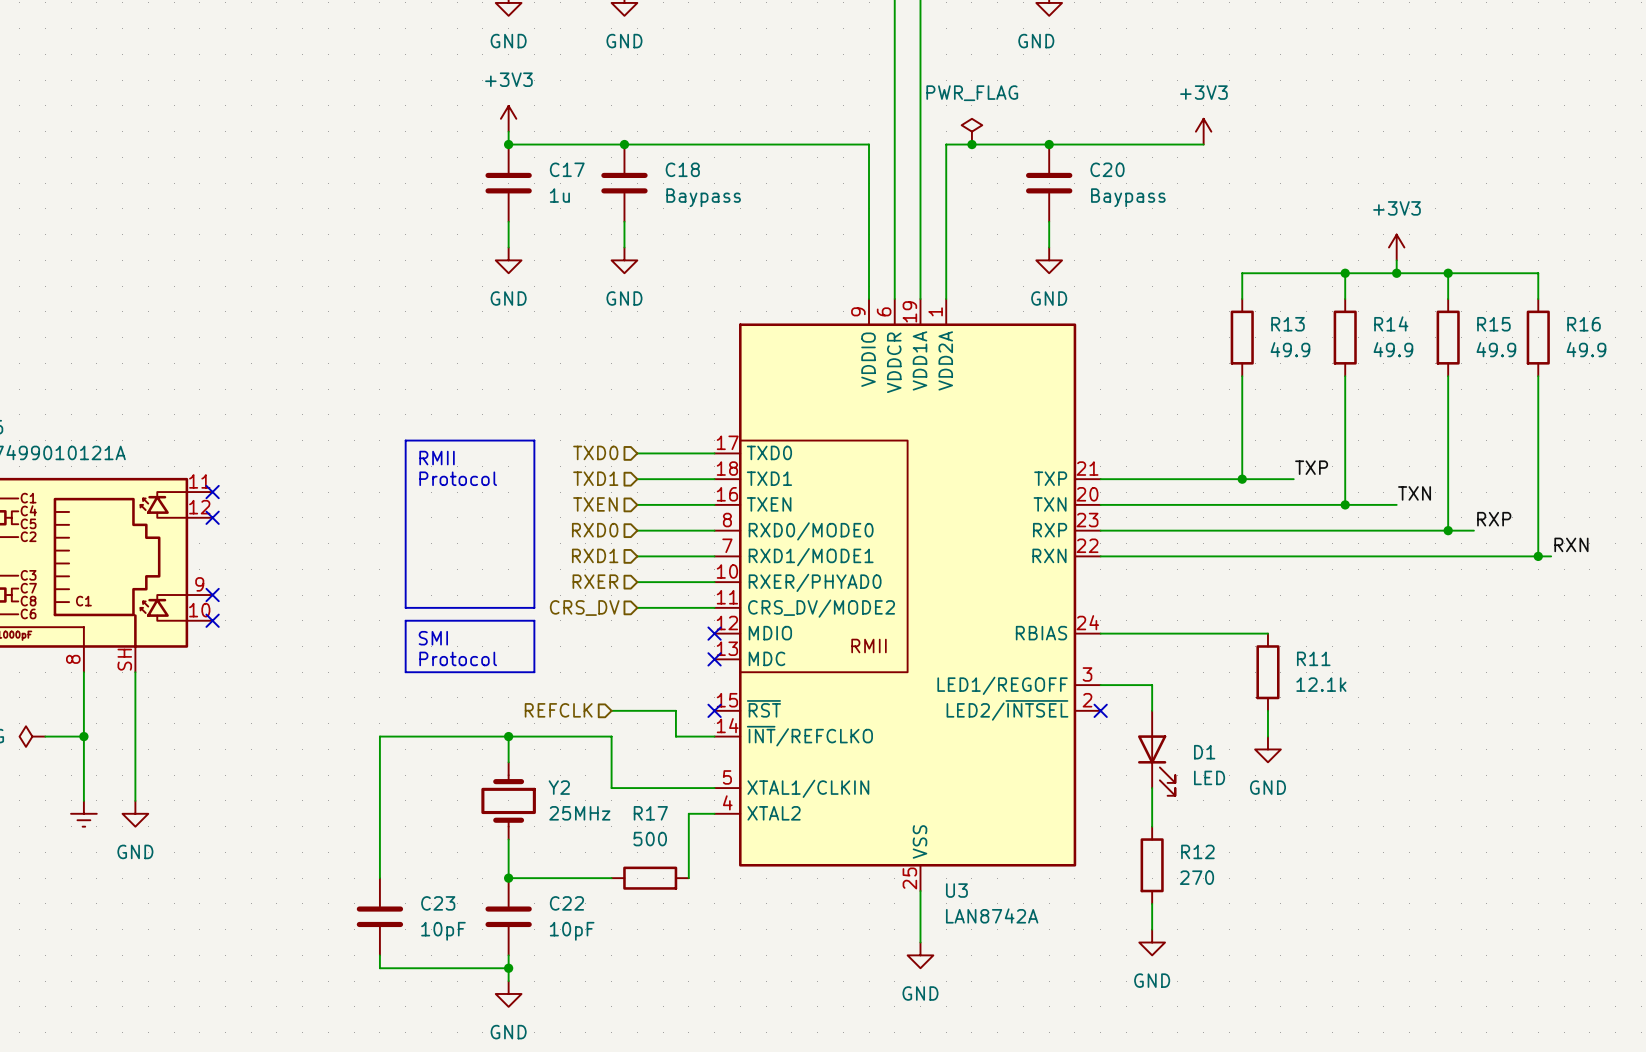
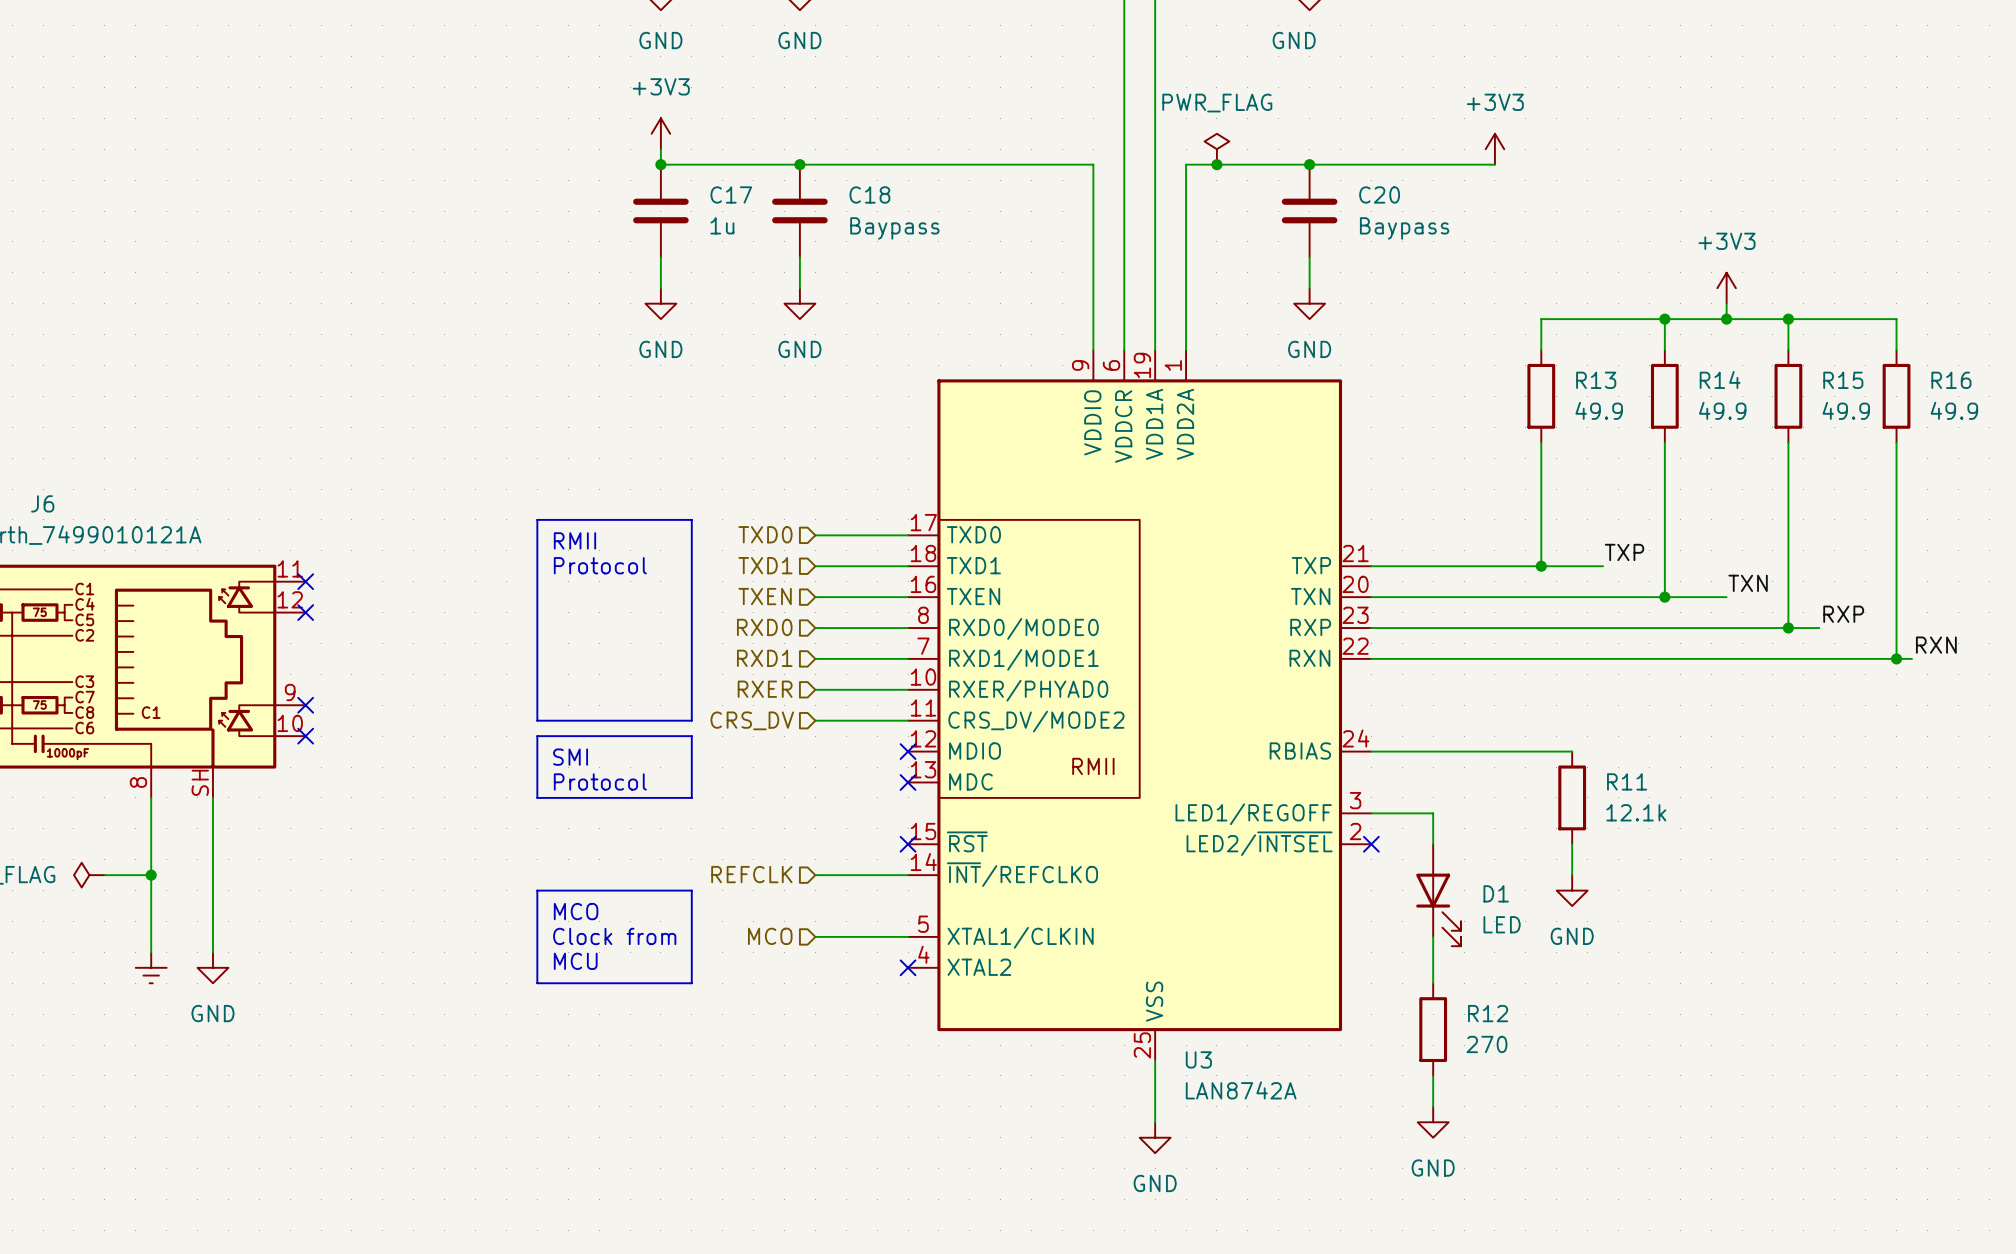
hierarchical label position: REFCLK (558, 710) -> REFCLK (751, 874)
wire: (611, 710) (675, 710) (675, 736) -> (815, 875) (861, 875)
wire: (508, 736) (508, 762) -> none
junction: (508, 736) -> none
line: none -> (537, 890) (691, 890) (691, 983) (537, 983) (537, 890)
text: none -> MCO (576, 911)
text: none -> Clock from (614, 936)
hierarchical label: none -> MCO (770, 936)
wire: (637, 788) (611, 788) (611, 736) (379, 736) (379, 878) -> none
Y2: 25MHz (508, 800) -> none
text: none -> MCU (575, 961)
wire: (714, 813) (688, 813) (688, 878) -> none
no-connect mark: none -> (908, 967)
wire: (508, 839) (508, 878) (611, 878) -> none
junction: (508, 878) -> none
R17: 500 (650, 878) -> none
C23: 10pF (379, 916) -> none
C22: 10pF (508, 916) -> none
wire: (379, 955) (379, 968) (508, 968) -> none
wire: (508, 955) (508, 981) -> none
junction: (508, 968) -> none
power symbol: GND (508, 993) -> none

